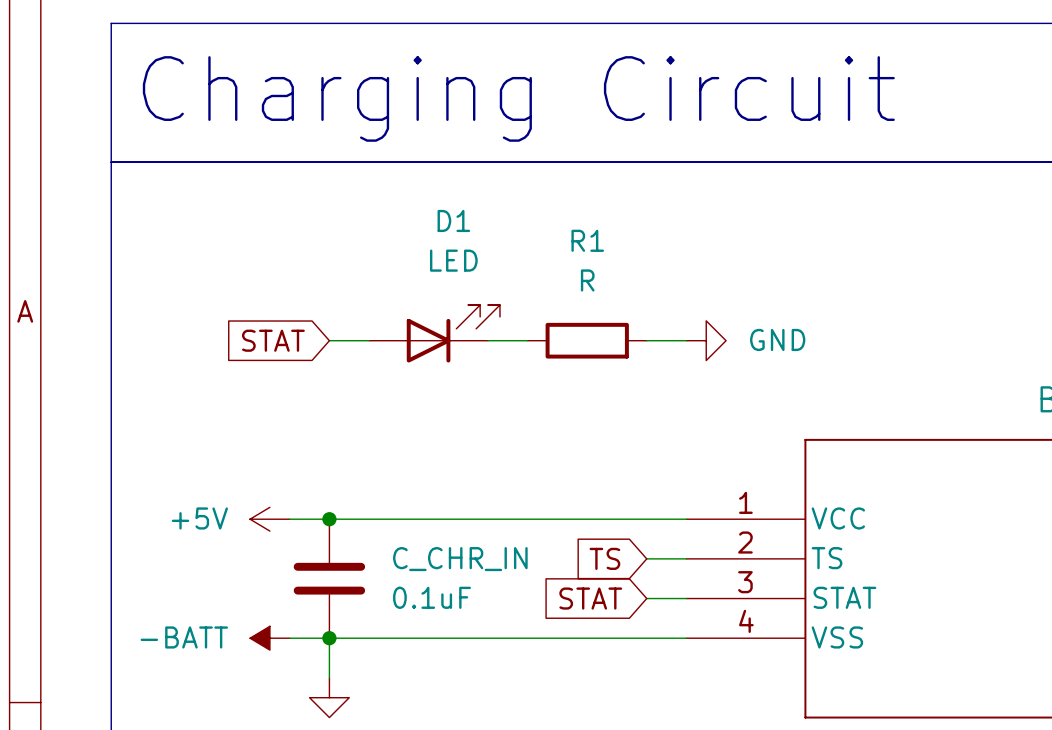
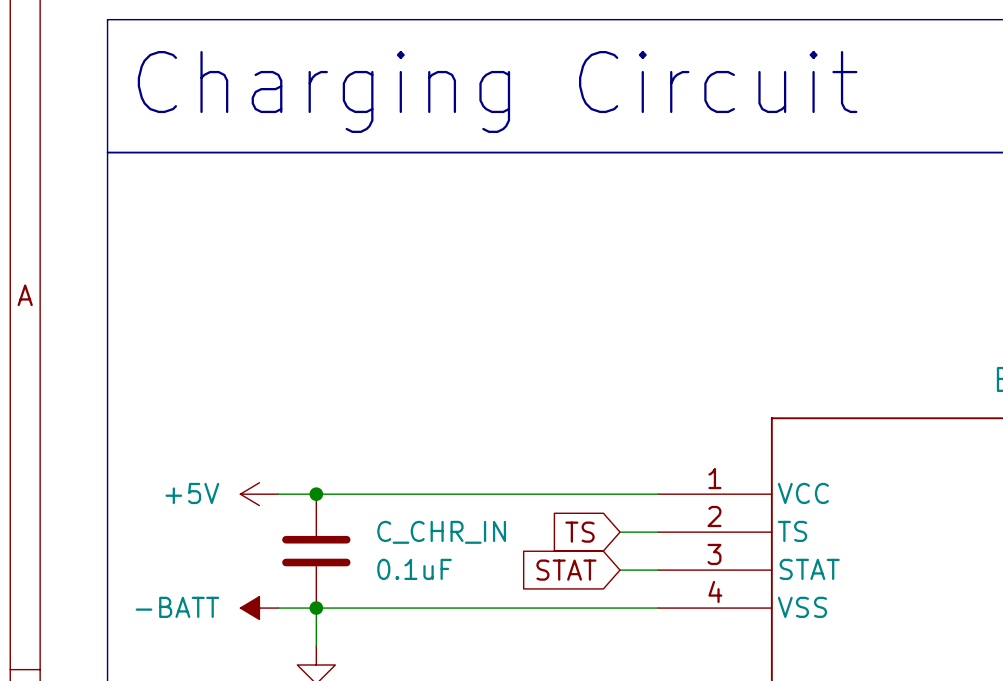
D1: LED (434, 333) -> none
global label: STAT (273, 340) -> none
wire: (329, 340) (369, 340) -> none
wire: (488, 340) (527, 340) -> none
R1: R (587, 340) -> none
wire: (646, 340) (686, 340) -> none
power symbol: GND (706, 340) -> none

